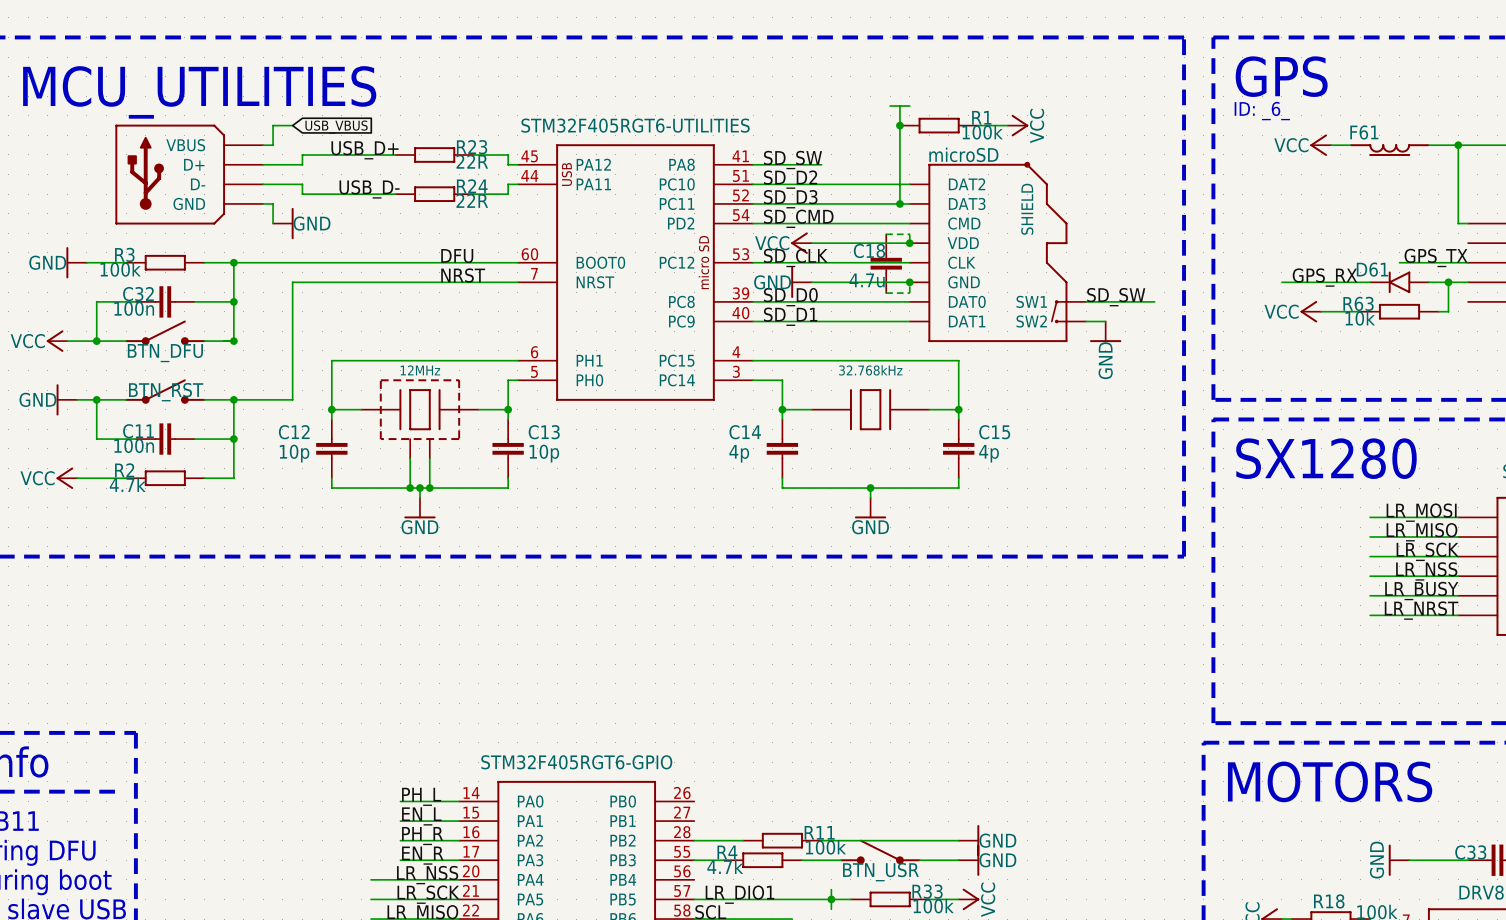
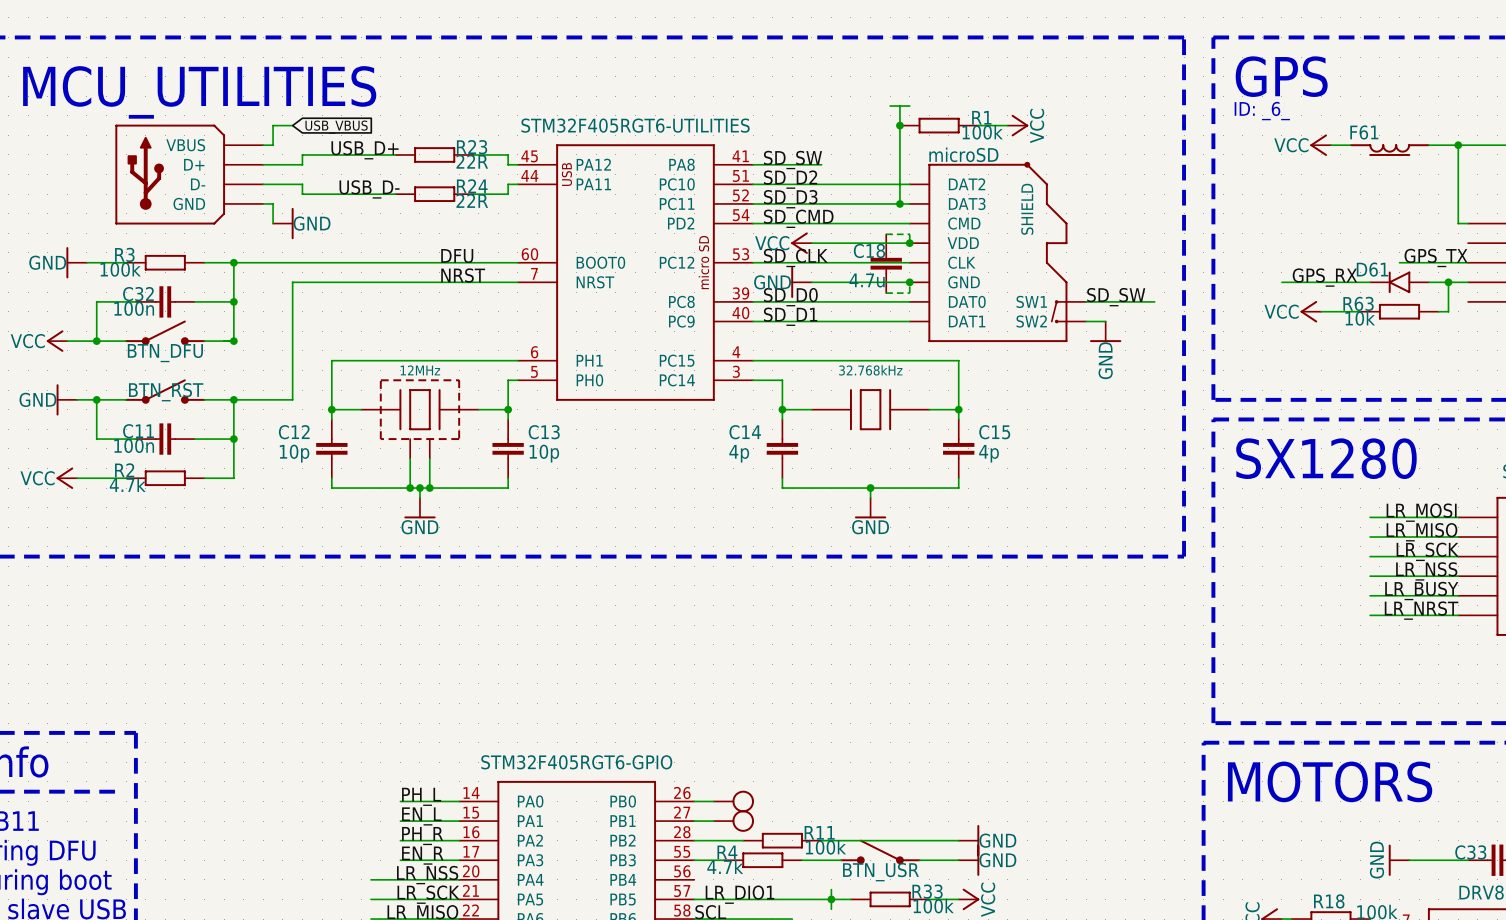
wire: none -> (694, 801) (713, 801)
part: none -> (733, 801)
wire: none -> (694, 821) (713, 821)
part: none -> (733, 821)

